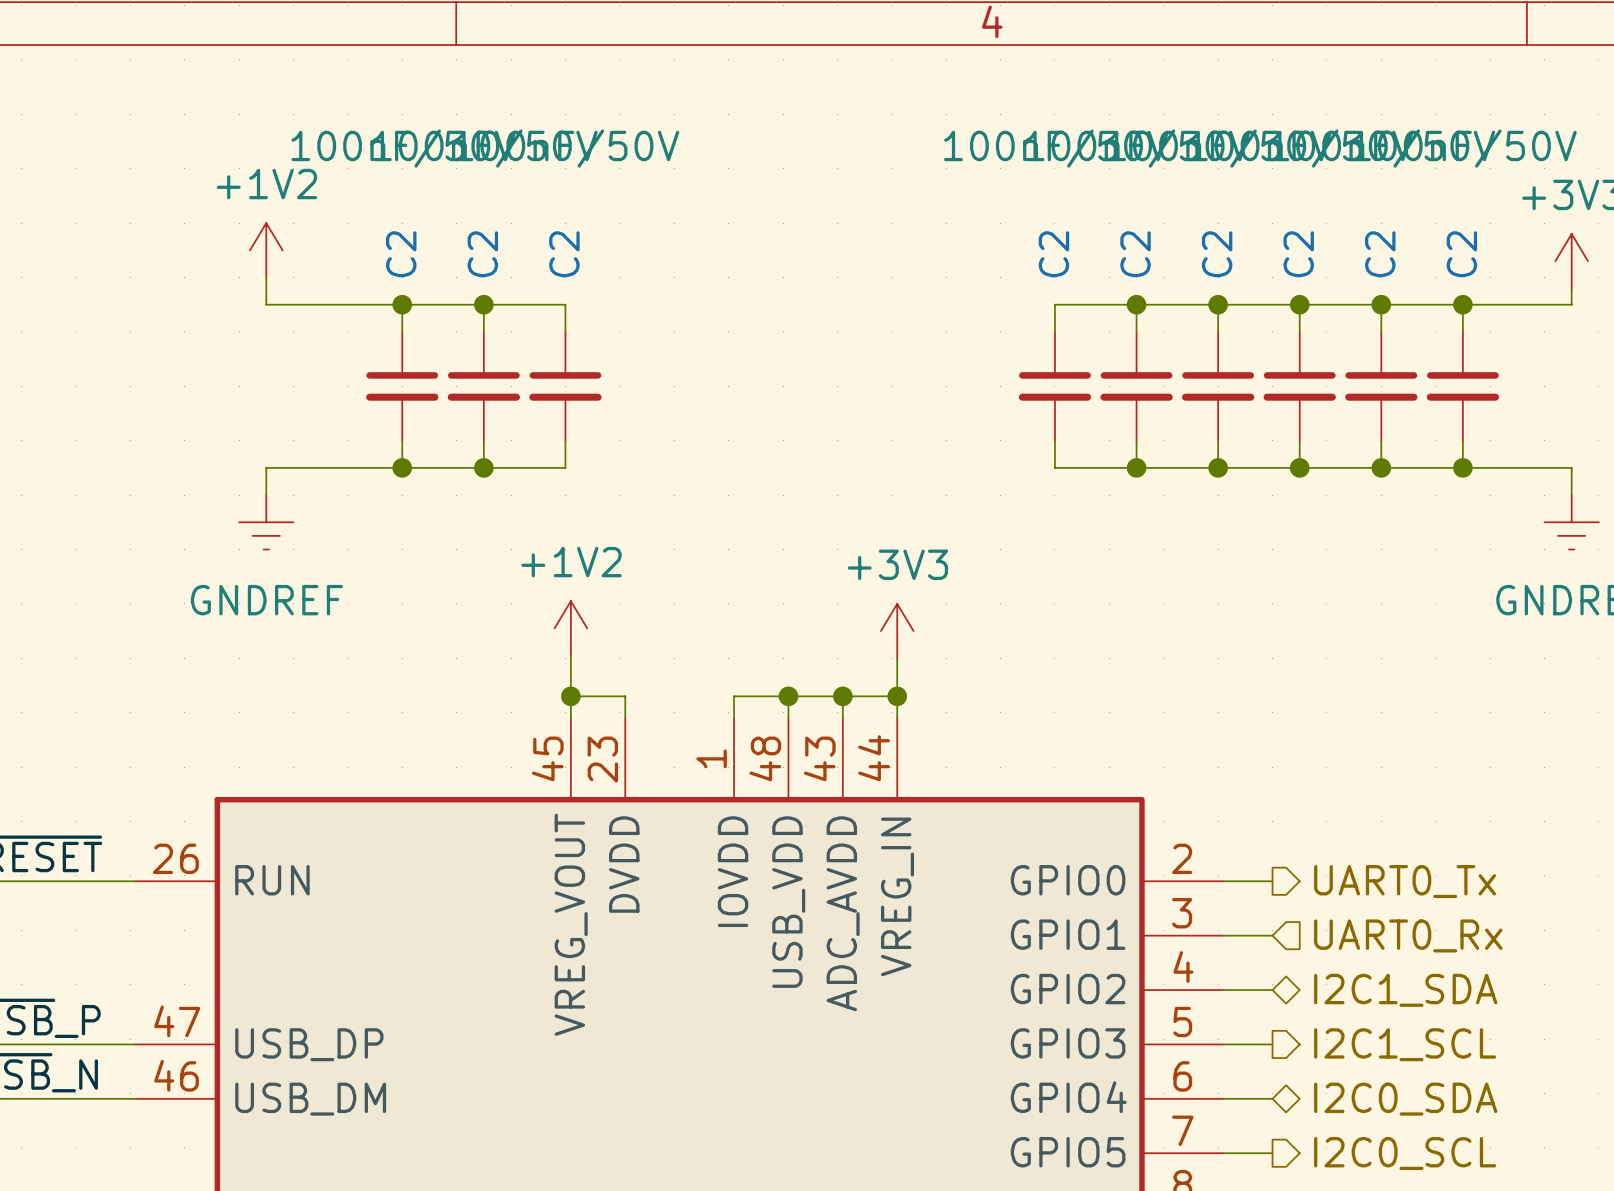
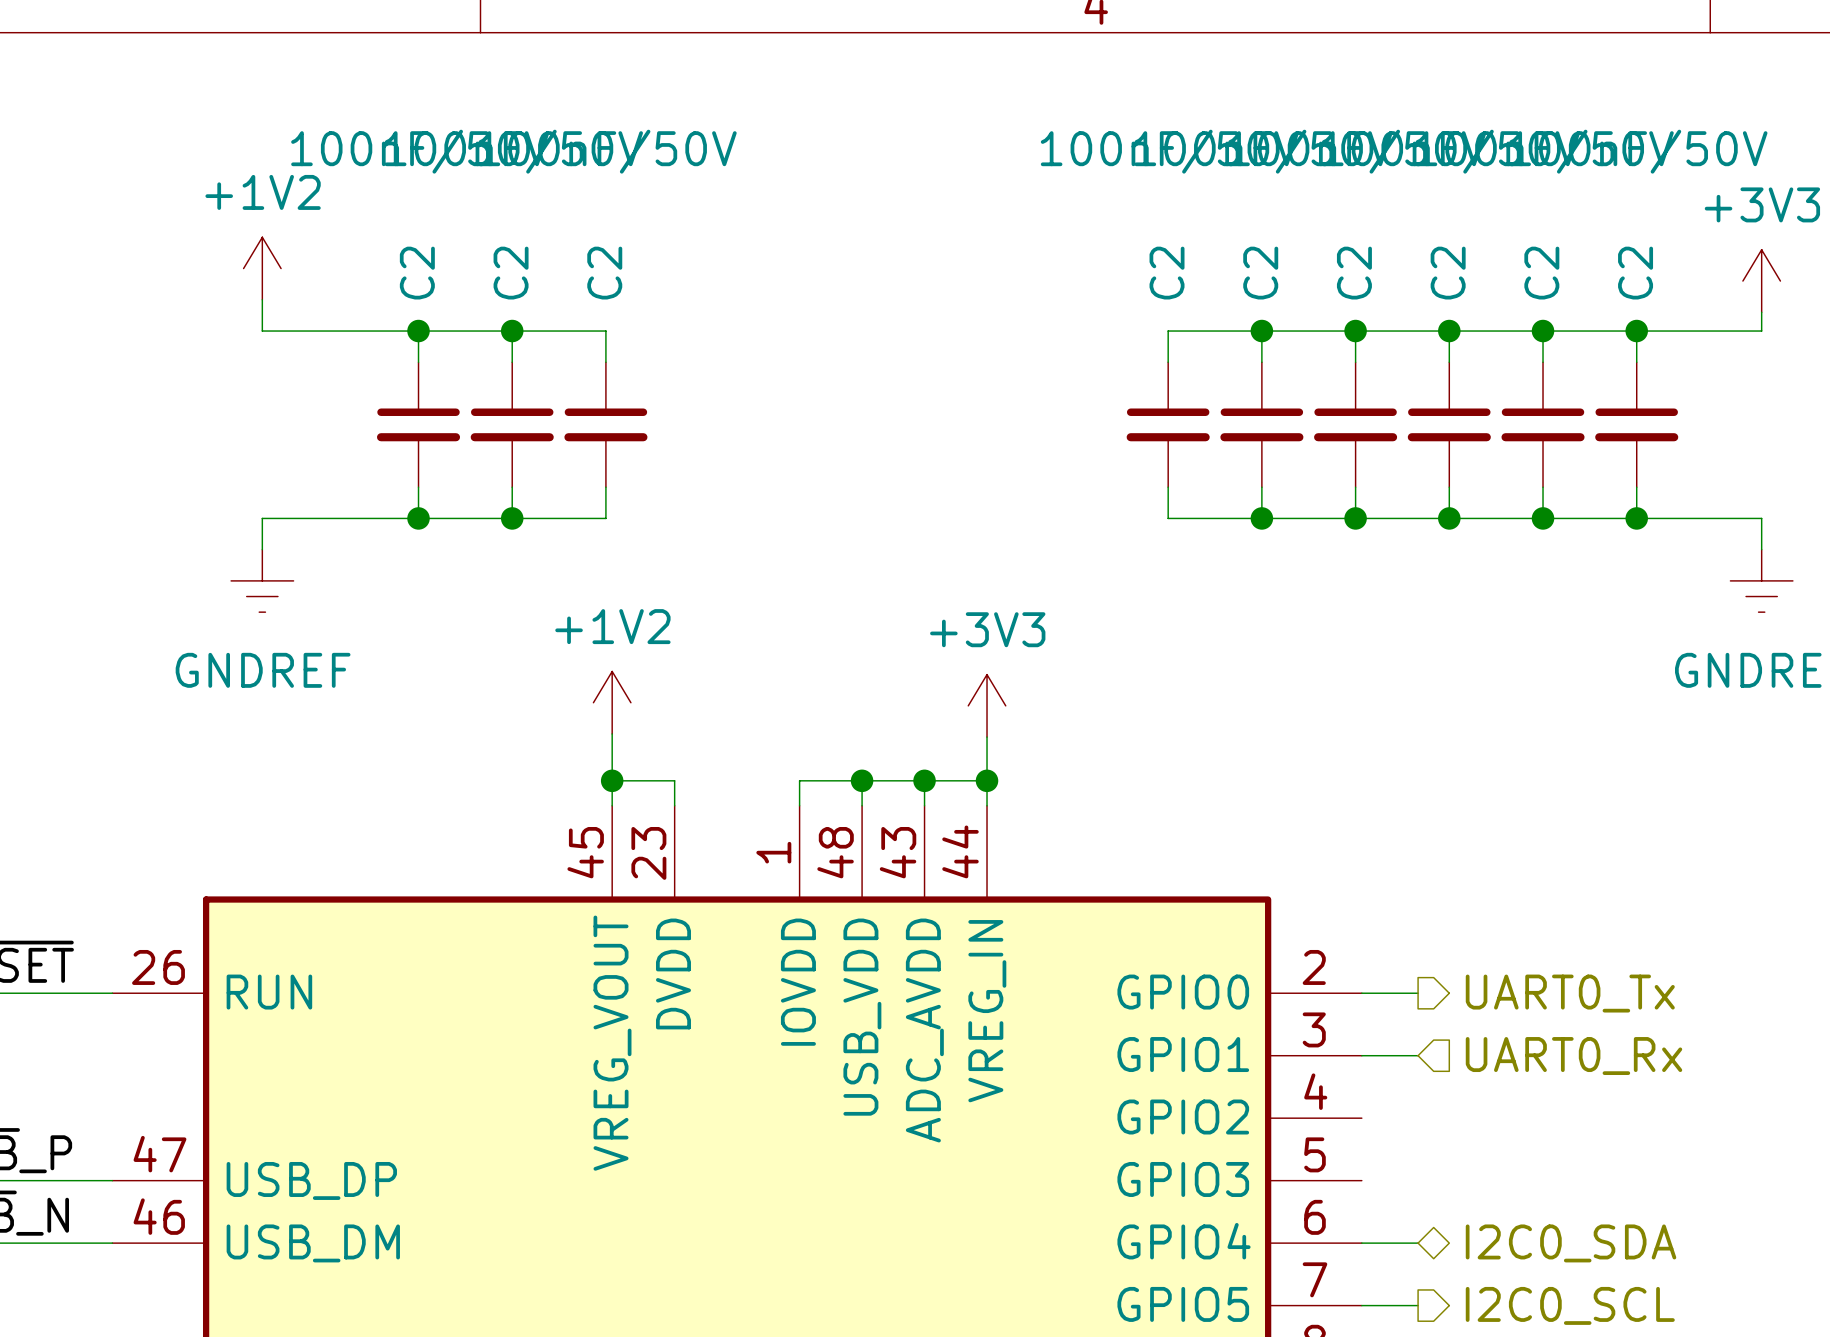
wire: (1223, 990) (1272, 990) -> none
hierarchical label: I2C1_SDA (1405, 990) -> none
wire: (1223, 1044) (1272, 1044) -> none
hierarchical label: I2C1_SCL (1405, 1044) -> none

